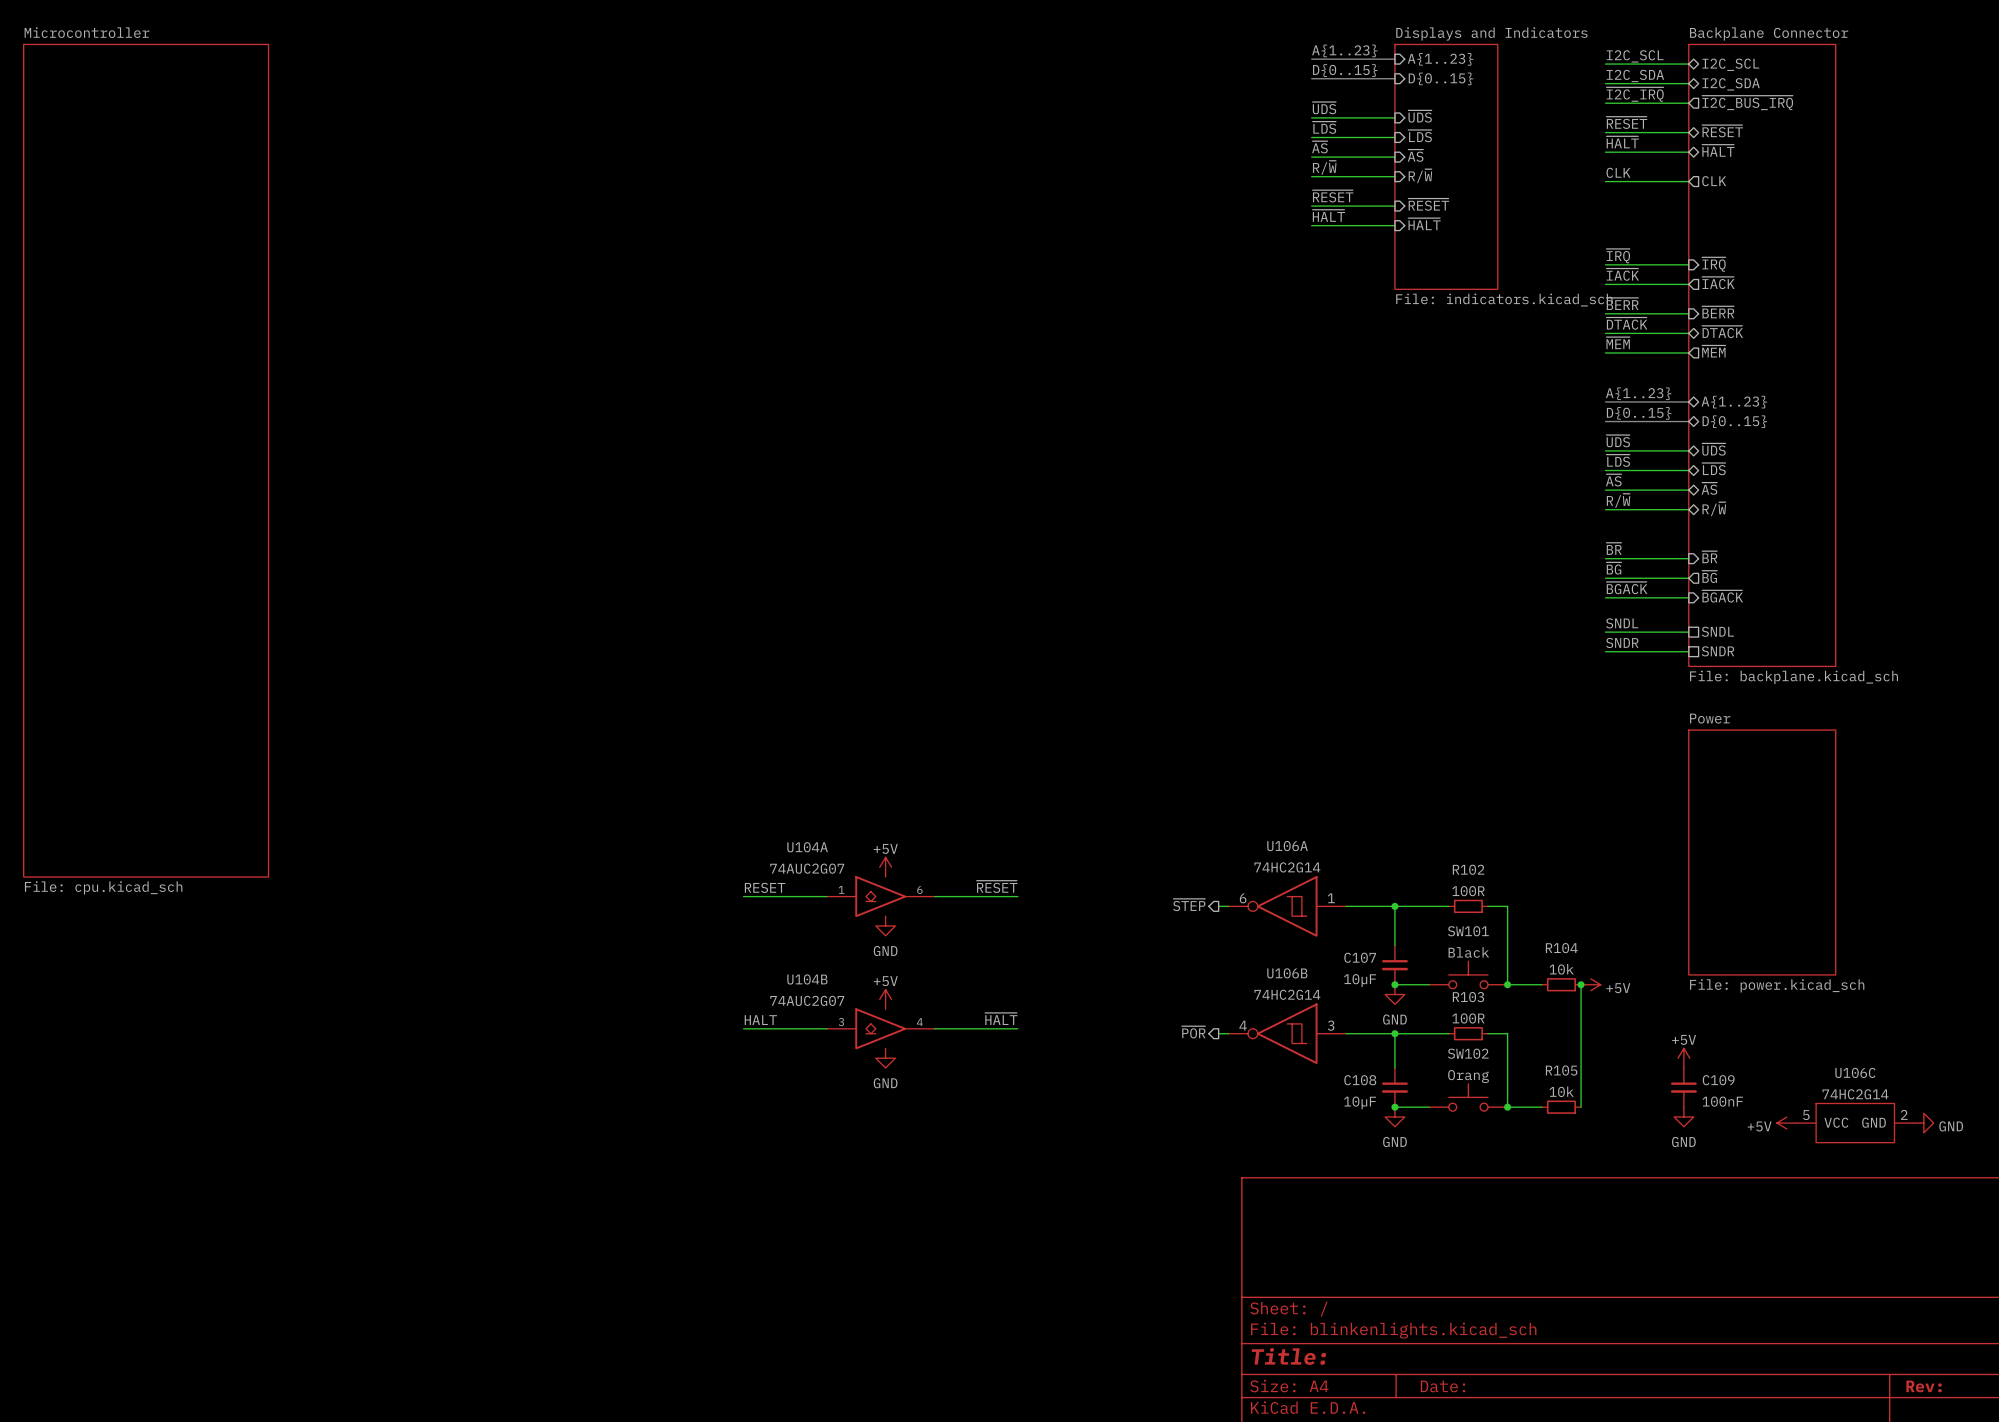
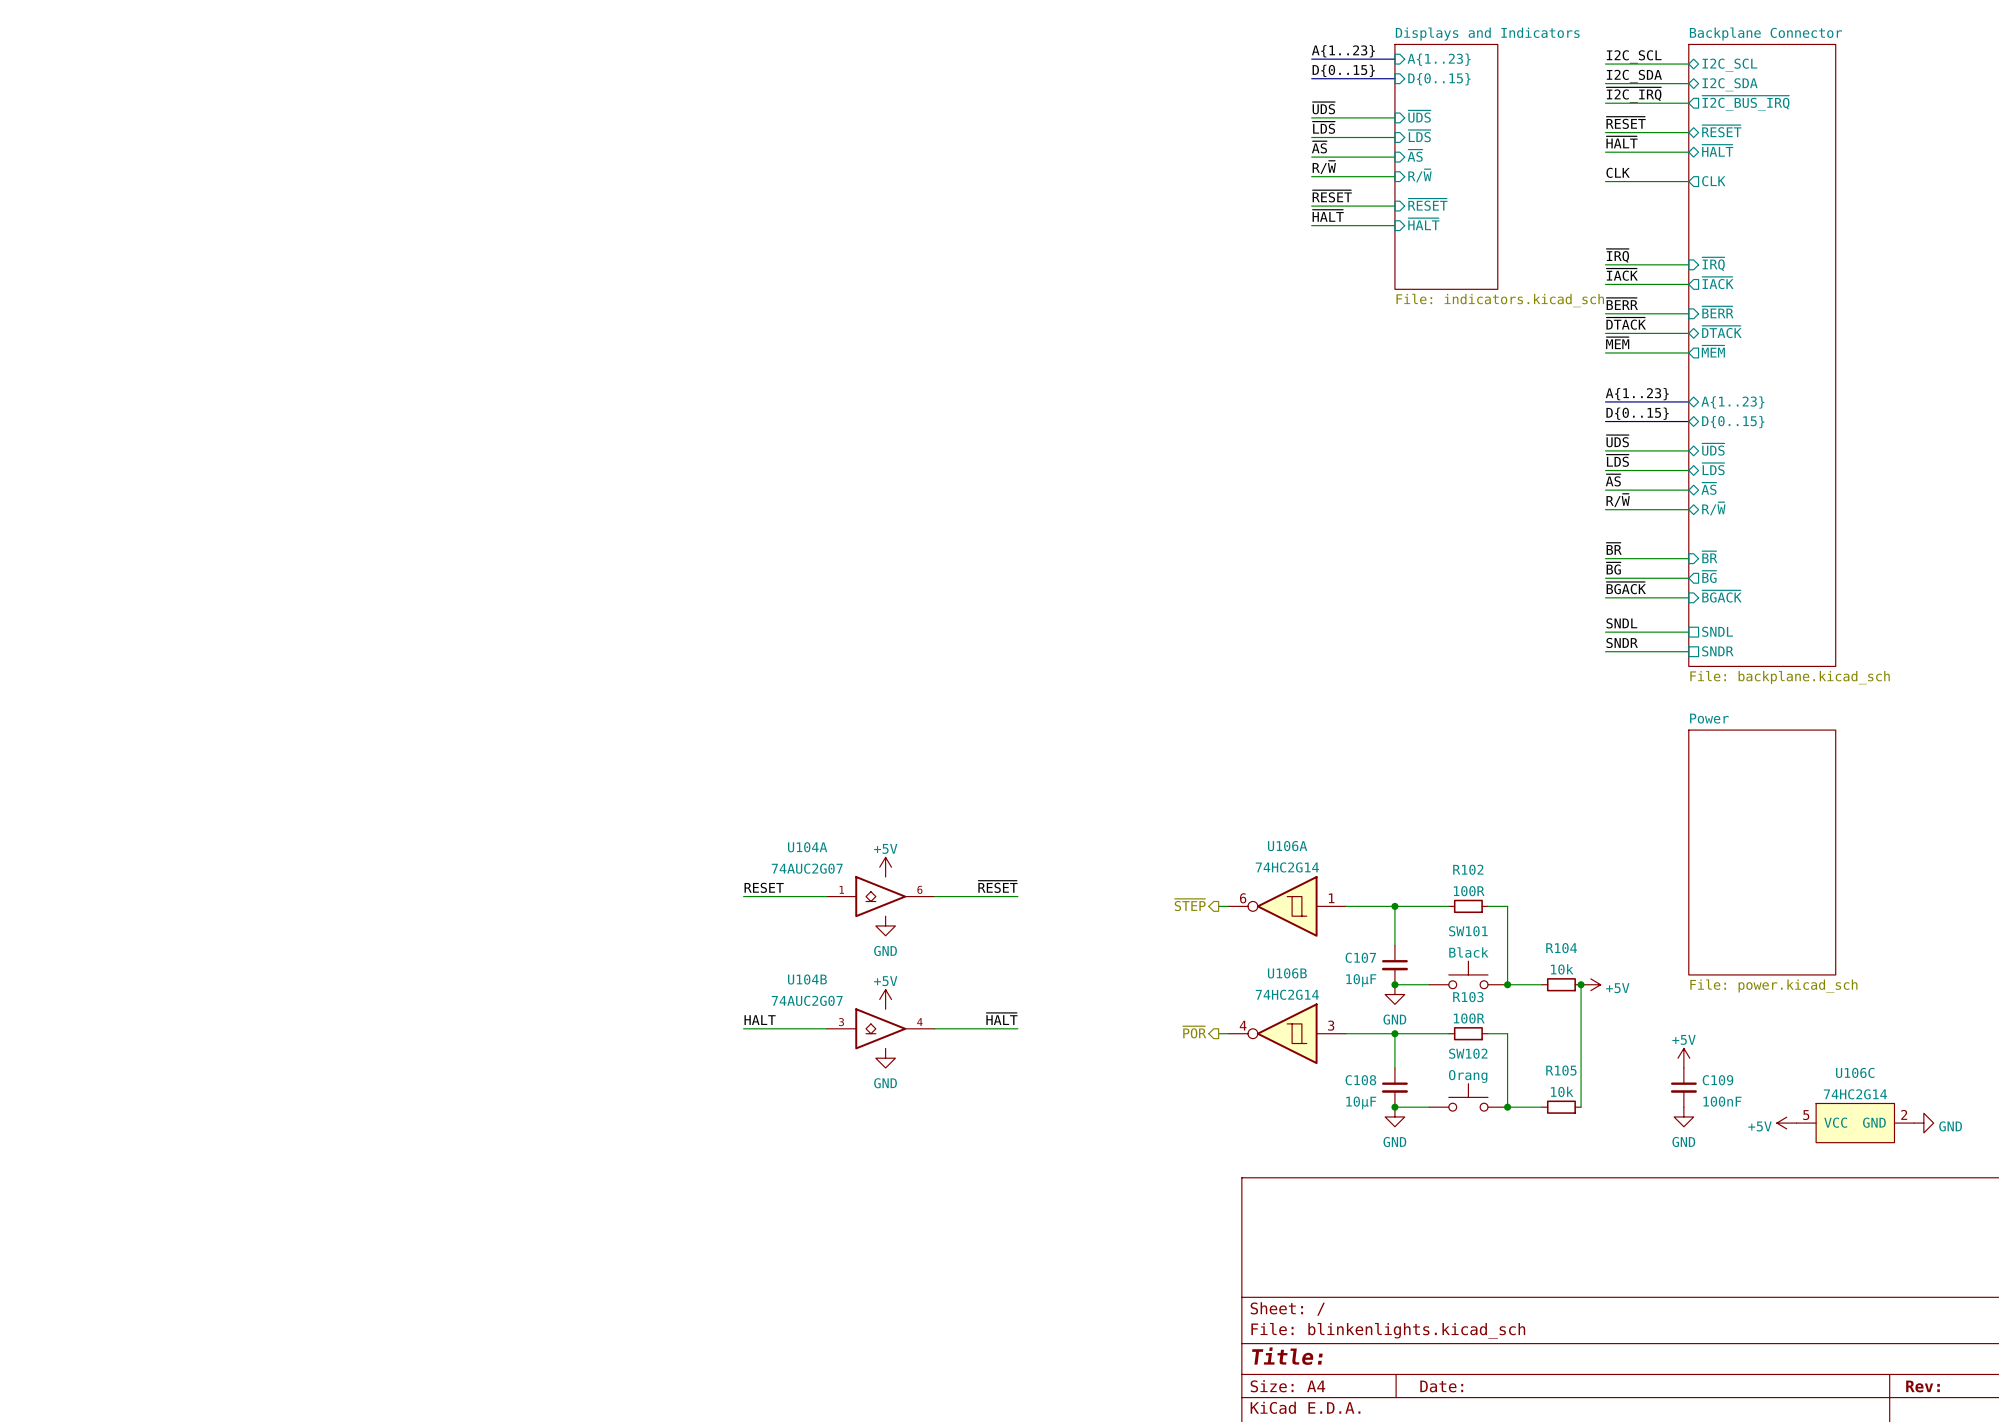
sheet Microcontroller: File: cpu.kicad_sch (146, 460) -> none

